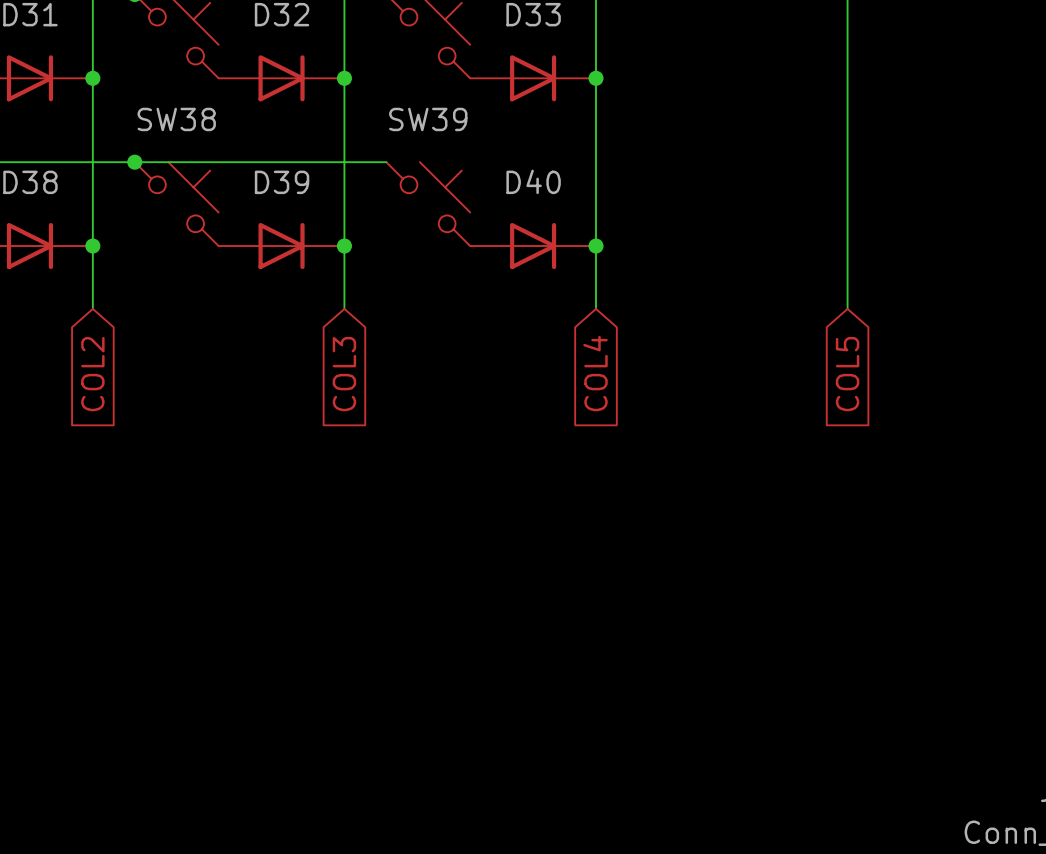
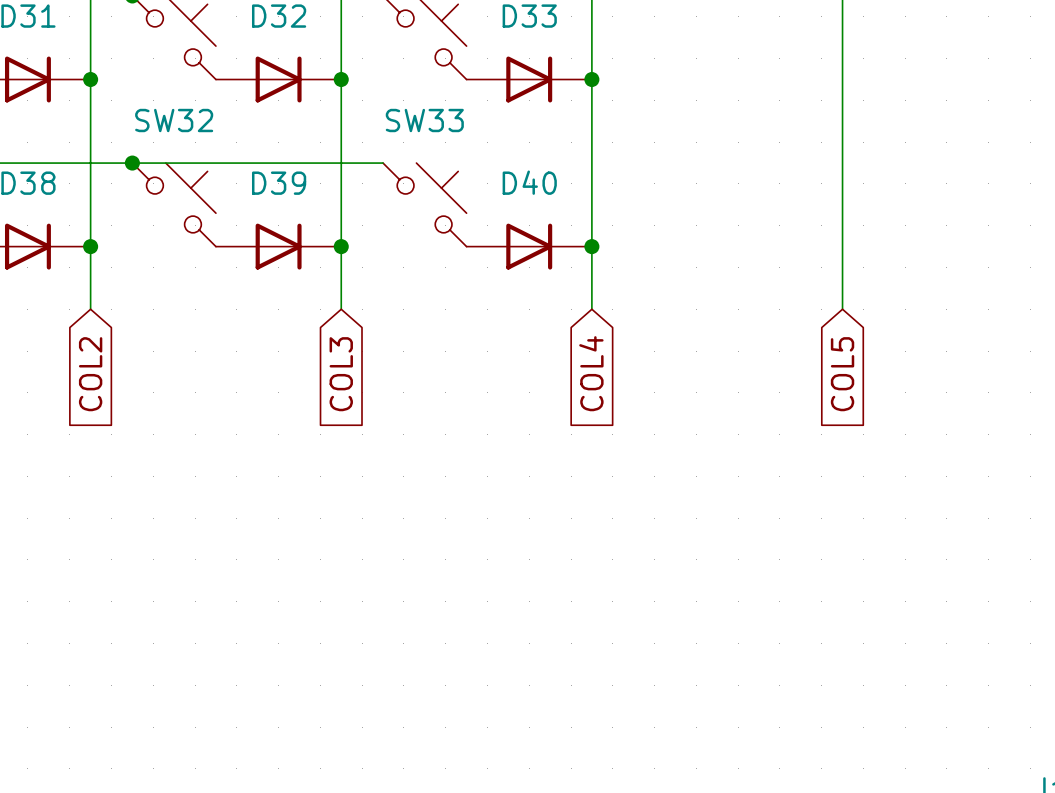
SW38 name: SW38 (176, 119) -> SW32 (174, 120)
SW39 name: SW39 (428, 119) -> SW33 (424, 120)

